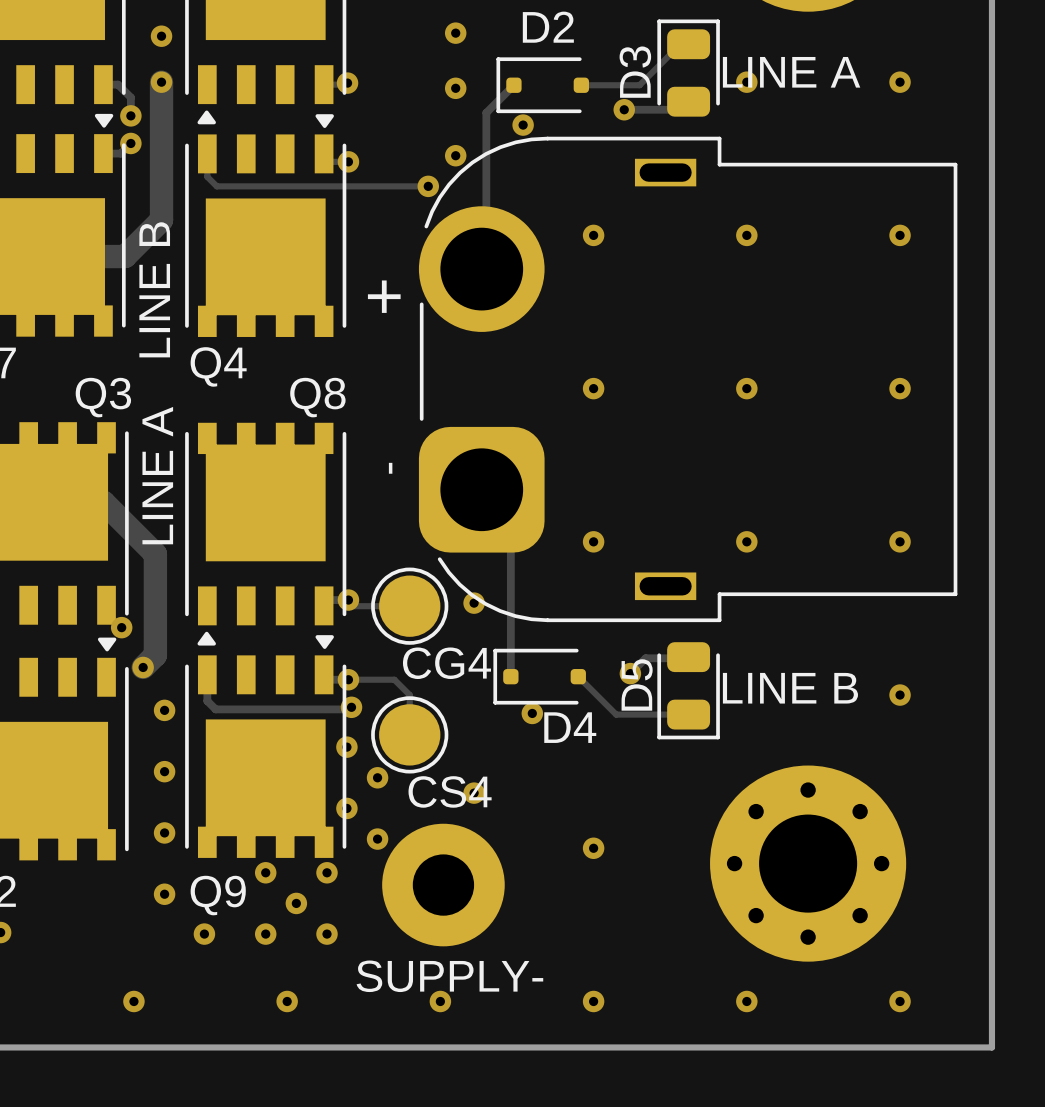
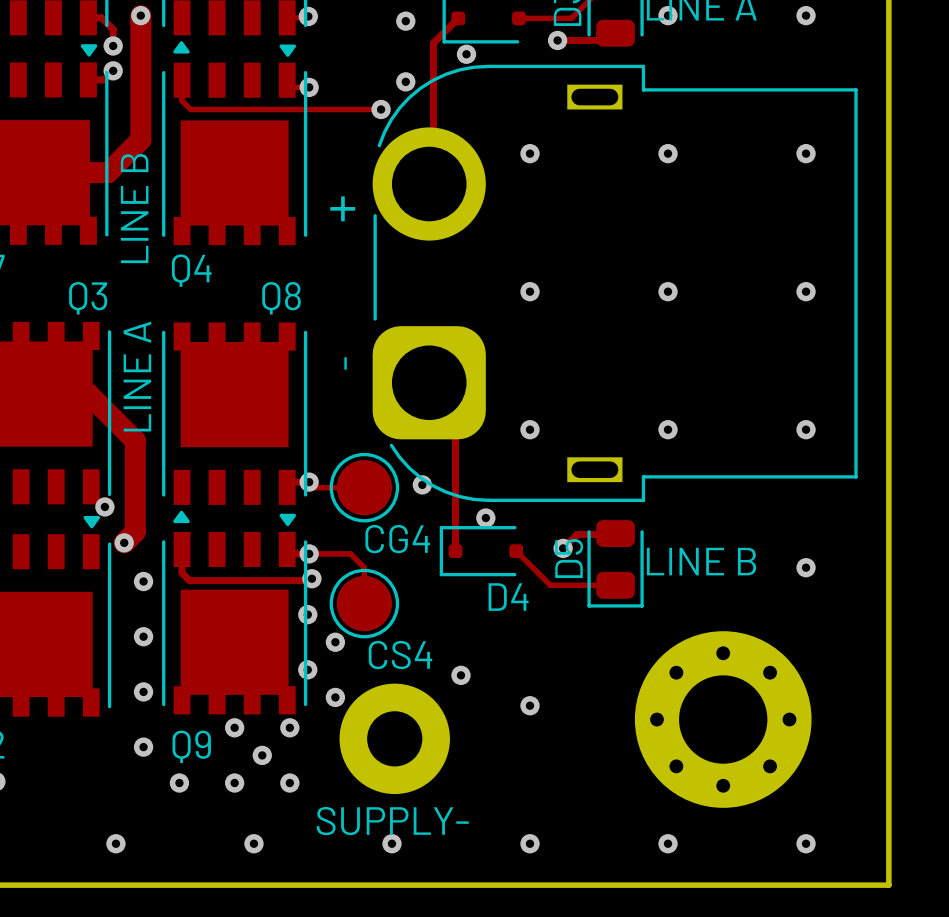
via: none -> (485, 518)
via: (532, 713) -> none
via position: (474, 793) -> (460, 675)

